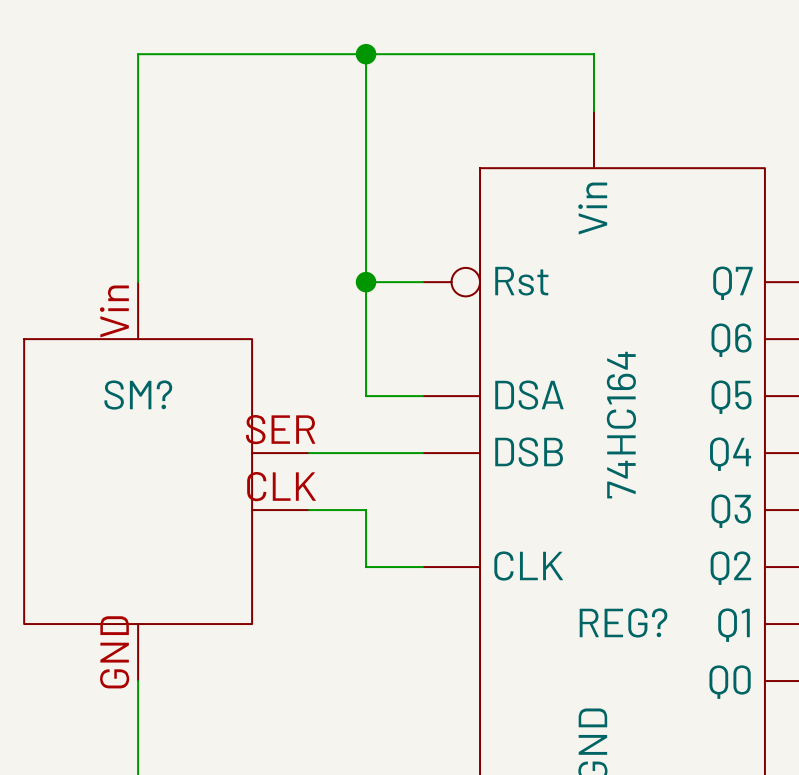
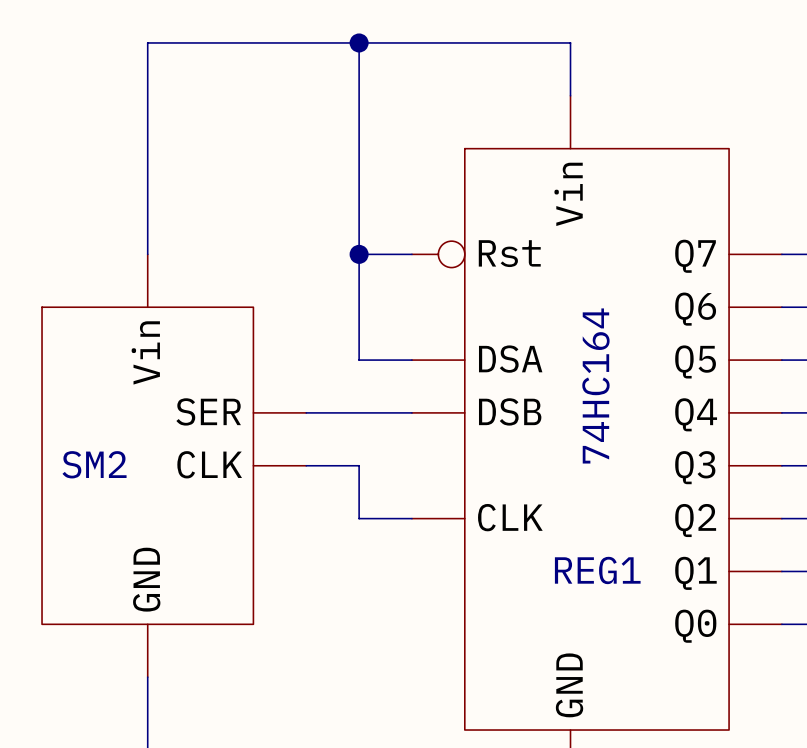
SM?: (166, 481) -> none
SM2: none -> (174, 465)
REG? name: REG? (623, 622) -> REG1 (597, 570)

